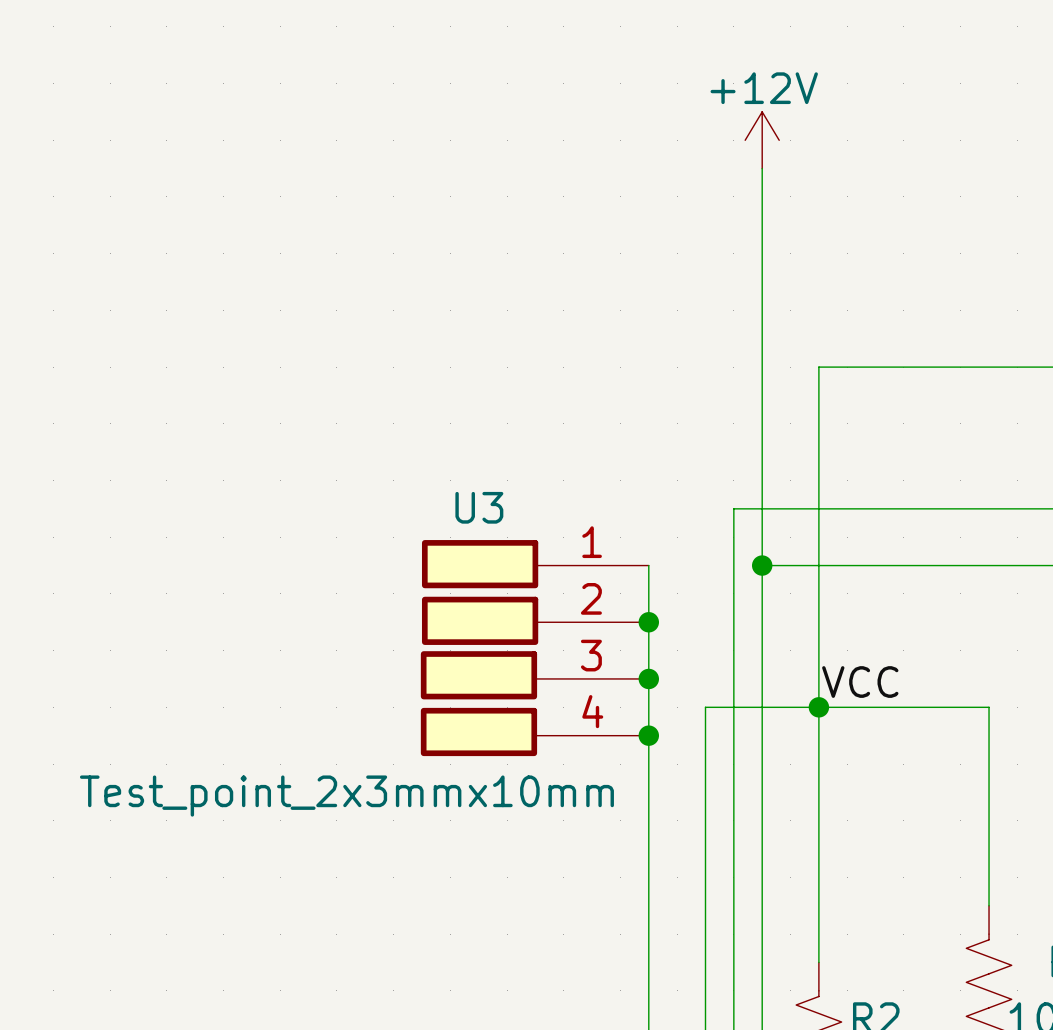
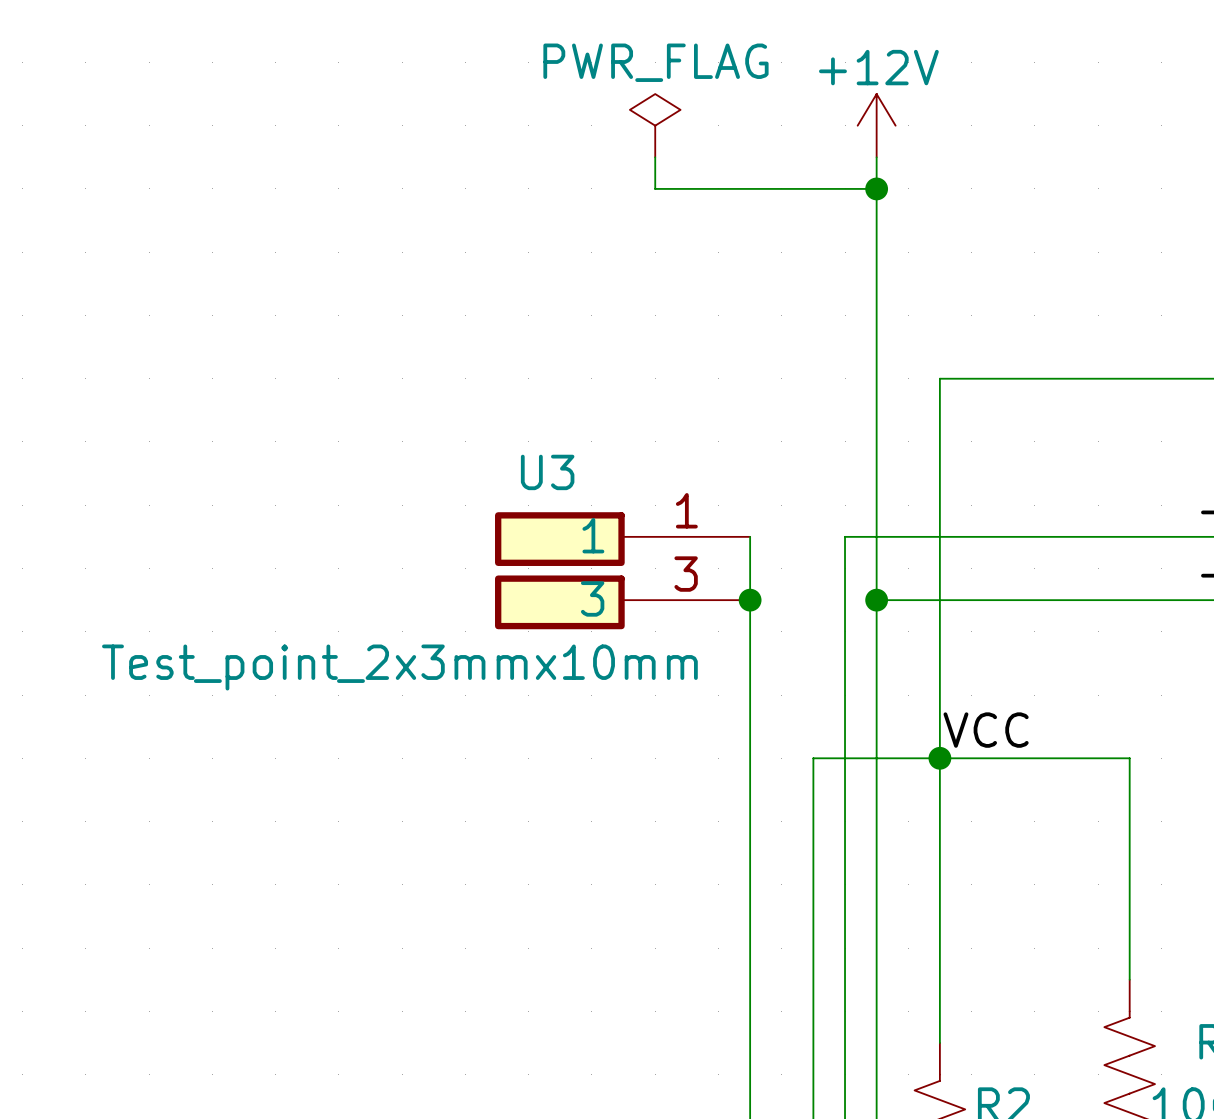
power symbol: none -> PWR_FLAG (655, 125)
wire: none -> (655, 157) (655, 188) (876, 188)
junction: none -> (876, 188)
U3 name position: U3 (479, 507) -> U3 (547, 472)
wire: none -> (750, 536) (750, 600)
U3 symbol: [420, 540, 649, 757] -> [495, 512, 751, 630]
junction: none -> (750, 600)
junction: (648, 622) -> none
junction: (648, 678) -> none
junction: (648, 735) -> none
U3 value position: Test_point_2x3mmx10mm (346, 796) -> Test_point_2x3mmx10mm (399, 667)

